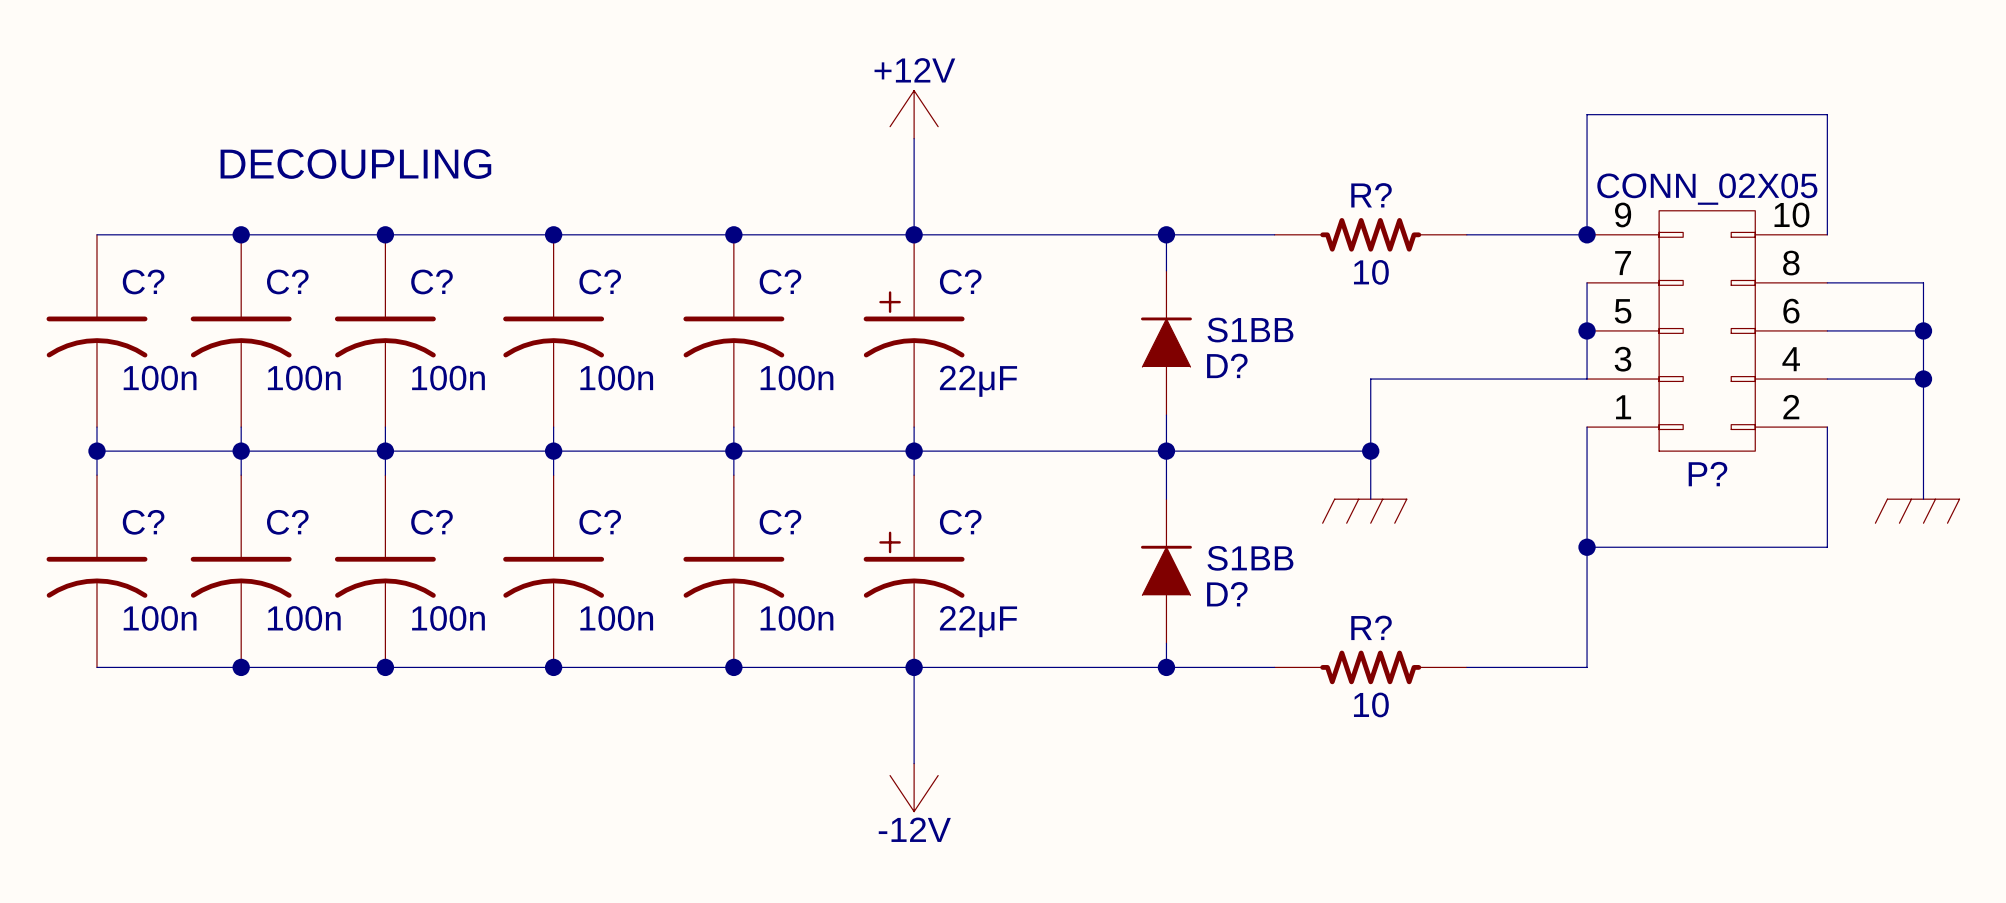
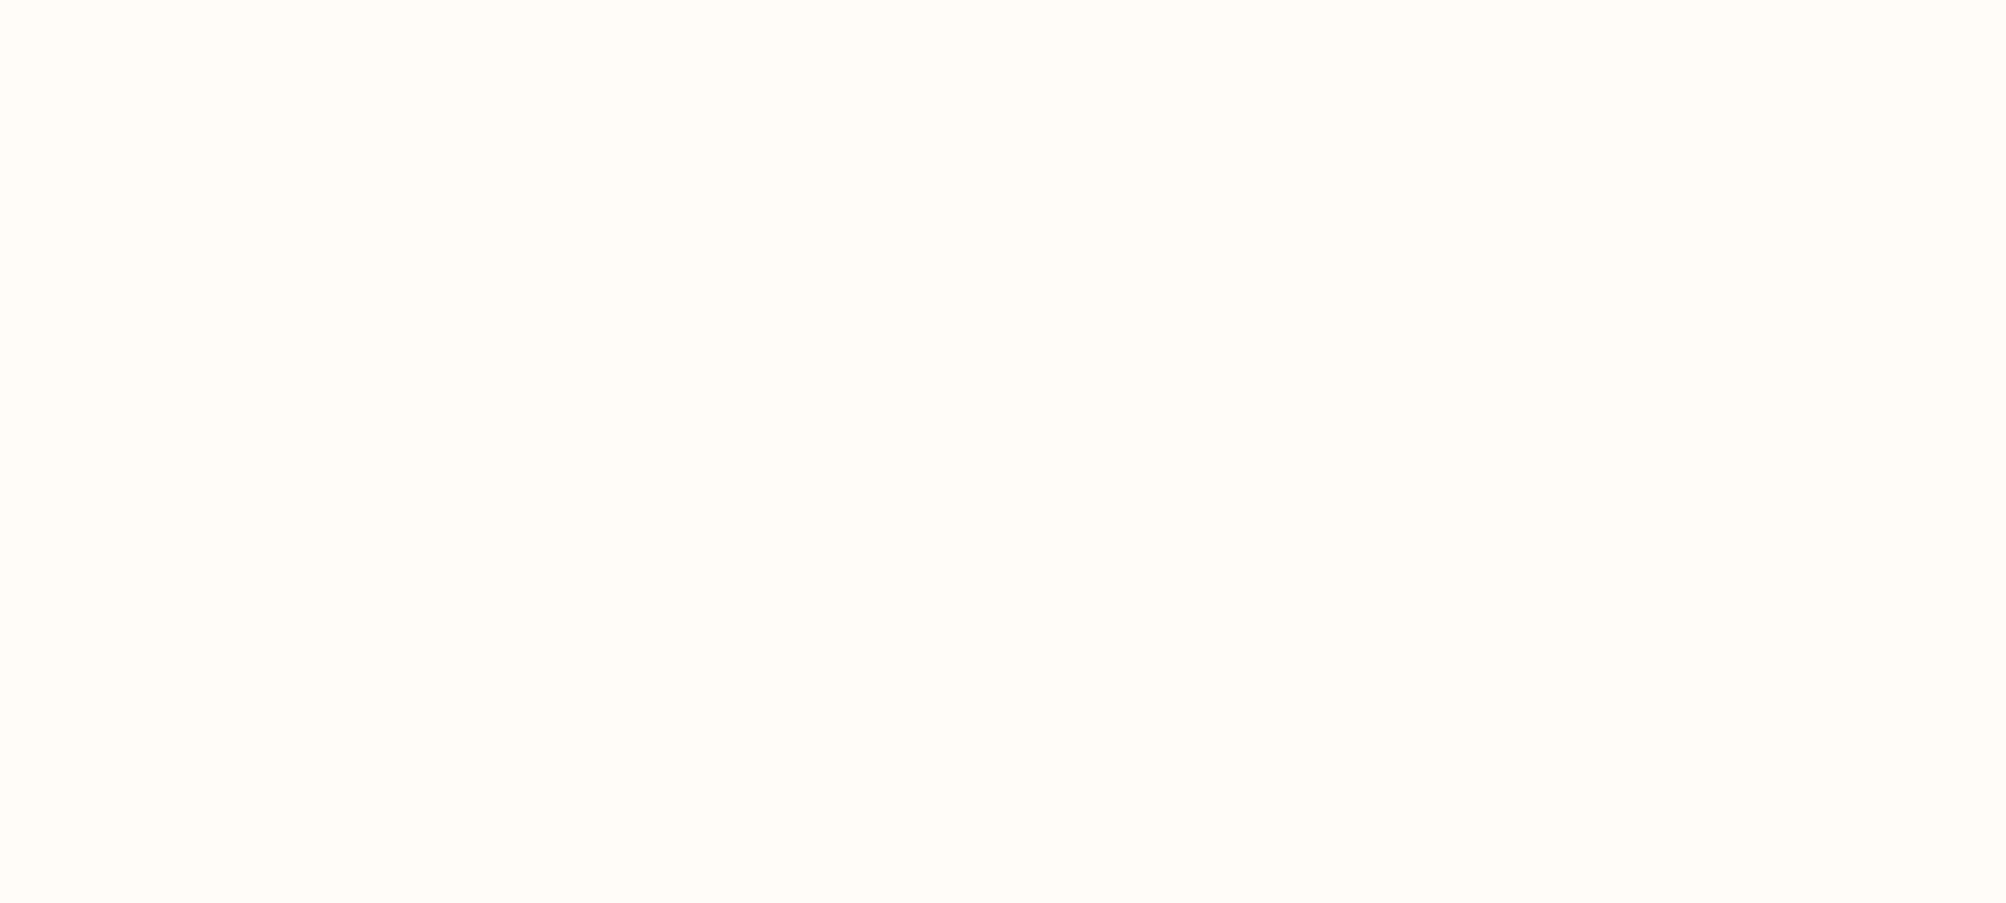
power symbol: +12V (914, 114) -> none
wire: (914, 138) (914, 234) -> none
text: DECOUPLING (355, 164) -> none
wire: (96, 234) (1274, 234) -> none
junction: (241, 234) -> none
junction: (385, 234) -> none
junction: (553, 234) -> none
junction: (733, 234) -> none
junction: (914, 234) -> none
wire: (1166, 234) (1166, 270) -> none
junction: (1166, 234) -> none
R?: 10 (1370, 234) -> none
wire: (1466, 234) (1587, 234) (1587, 114) (1827, 114) (1827, 234) -> none
junction: (1587, 234) -> none
wire: (1587, 282) (1587, 379) (1370, 379) (1370, 499) -> none
wire: (1827, 282) (1923, 282) (1923, 499) -> none
C?: 100n (96, 330) -> none
C?: 100n (241, 330) -> none
C?: 100n (385, 330) -> none
C?: 100n (553, 330) -> none
C?: 100n (733, 330) -> none
C?: 22μF (914, 330) -> none
junction: (1587, 330) -> none
P?: CONN_02X05 (1707, 330) -> none
wire: (1827, 330) (1923, 330) -> none
junction: (1923, 330) -> none
D?: S1BB (1166, 342) -> none
wire: (1827, 379) (1923, 379) -> none
junction: (1923, 379) -> none
wire: (1166, 415) (1166, 499) -> none
wire: (96, 427) (96, 475) -> none
wire: (241, 427) (241, 475) -> none
wire: (385, 427) (385, 475) -> none
wire: (553, 427) (553, 475) -> none
wire: (733, 427) (733, 475) -> none
wire: (914, 427) (914, 475) -> none
wire: (1587, 427) (1587, 667) (1466, 667) -> none
wire: (1827, 427) (1827, 547) (1587, 547) -> none
wire: (96, 451) (1370, 451) -> none
junction: (96, 451) -> none
junction: (241, 451) -> none
junction: (385, 451) -> none
junction: (553, 451) -> none
junction: (733, 451) -> none
junction: (914, 451) -> none
junction: (1166, 451) -> none
junction: (1370, 451) -> none
power symbol: (1364, 511) -> none
power symbol: (1917, 511) -> none
junction: (1587, 547) -> none
C?: 100n (96, 571) -> none
C?: 100n (241, 571) -> none
C?: 100n (385, 571) -> none
C?: 100n (553, 571) -> none
C?: 100n (733, 571) -> none
C?: 22μF (914, 571) -> none
D?: S1BB (1166, 571) -> none
wire: (1166, 643) (1166, 667) -> none
wire: (96, 667) (1274, 667) -> none
junction: (241, 667) -> none
junction: (385, 667) -> none
junction: (553, 667) -> none
junction: (733, 667) -> none
wire: (914, 667) (914, 763) -> none
junction: (914, 667) -> none
junction: (1166, 667) -> none
R?: 10 (1370, 667) -> none
power symbol: -12V (914, 787) -> none

